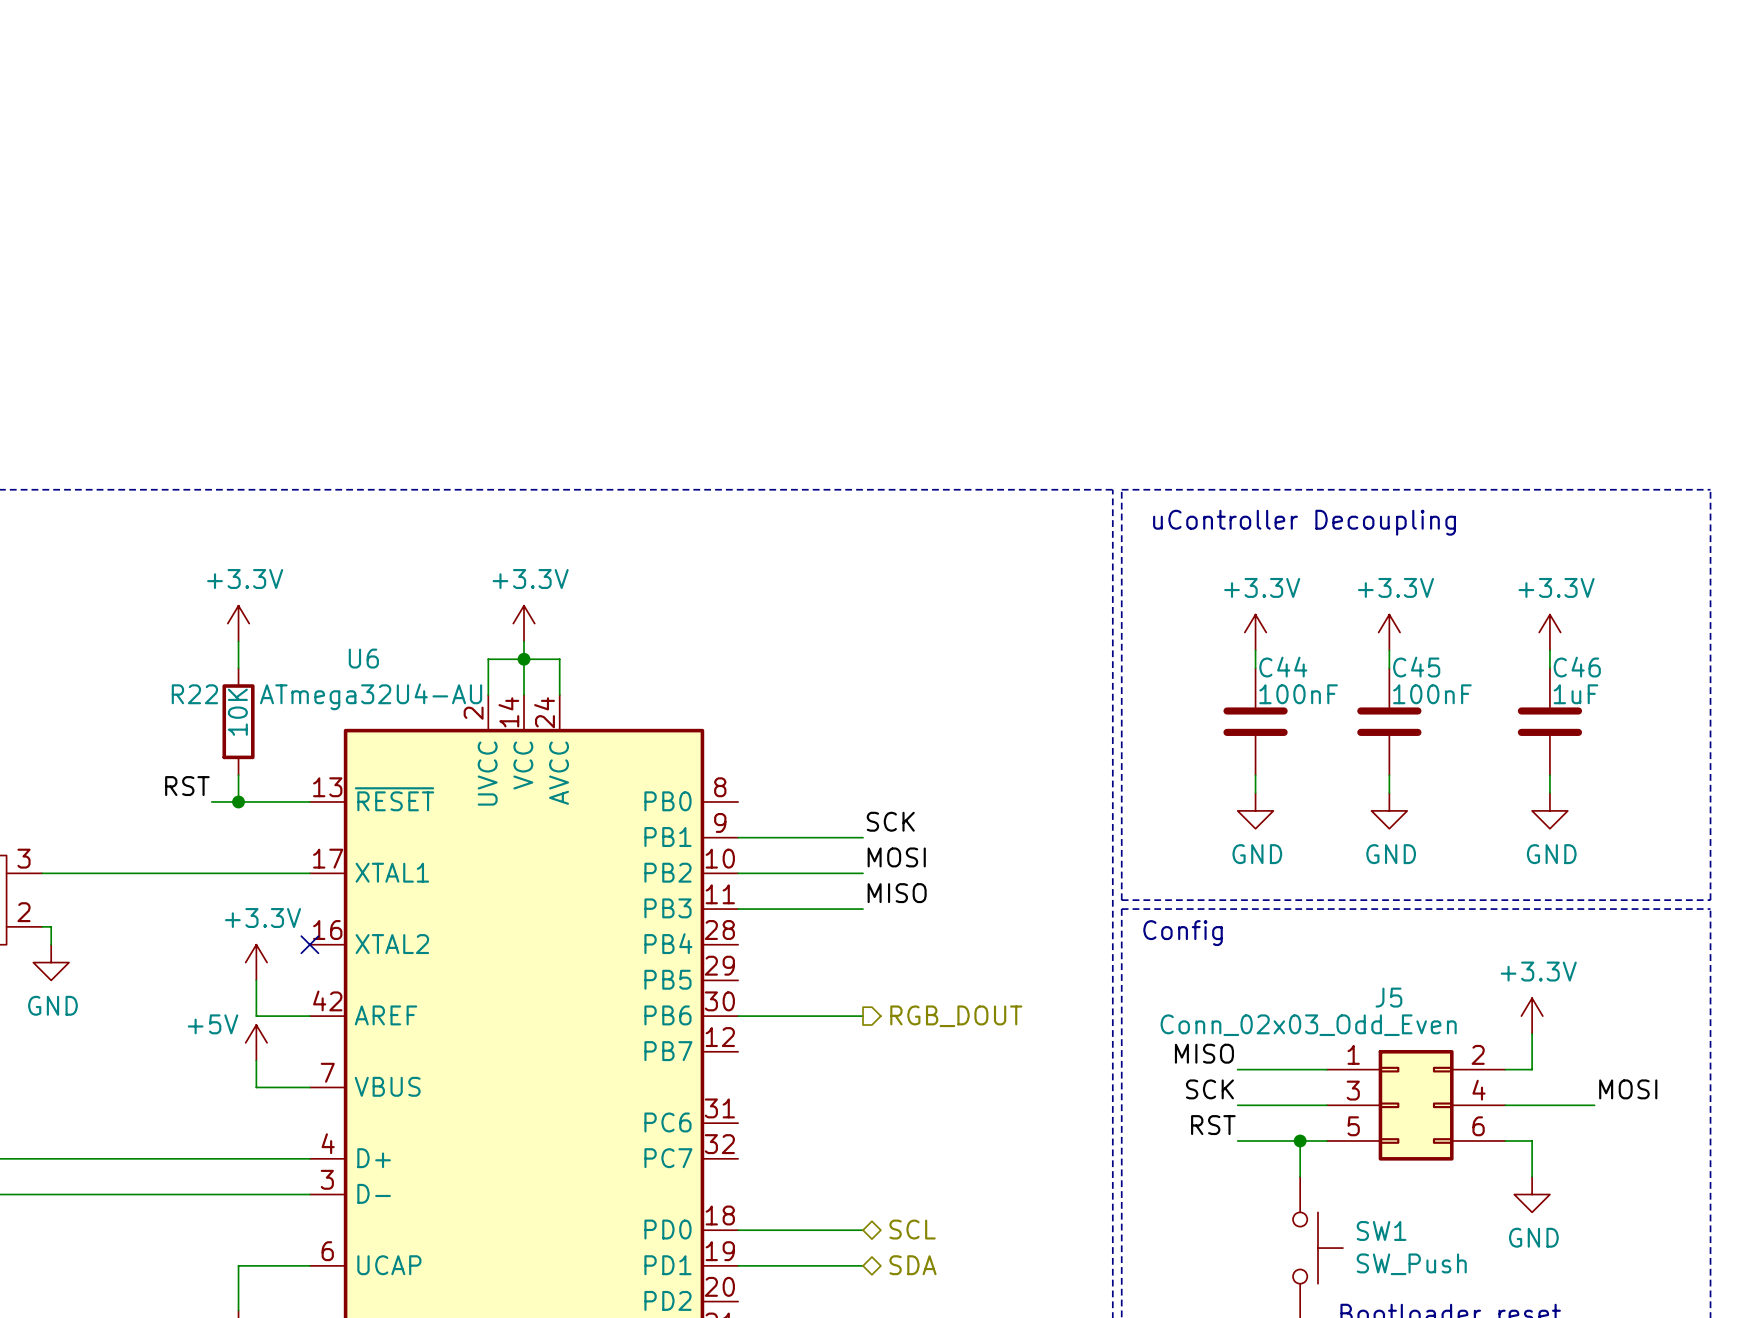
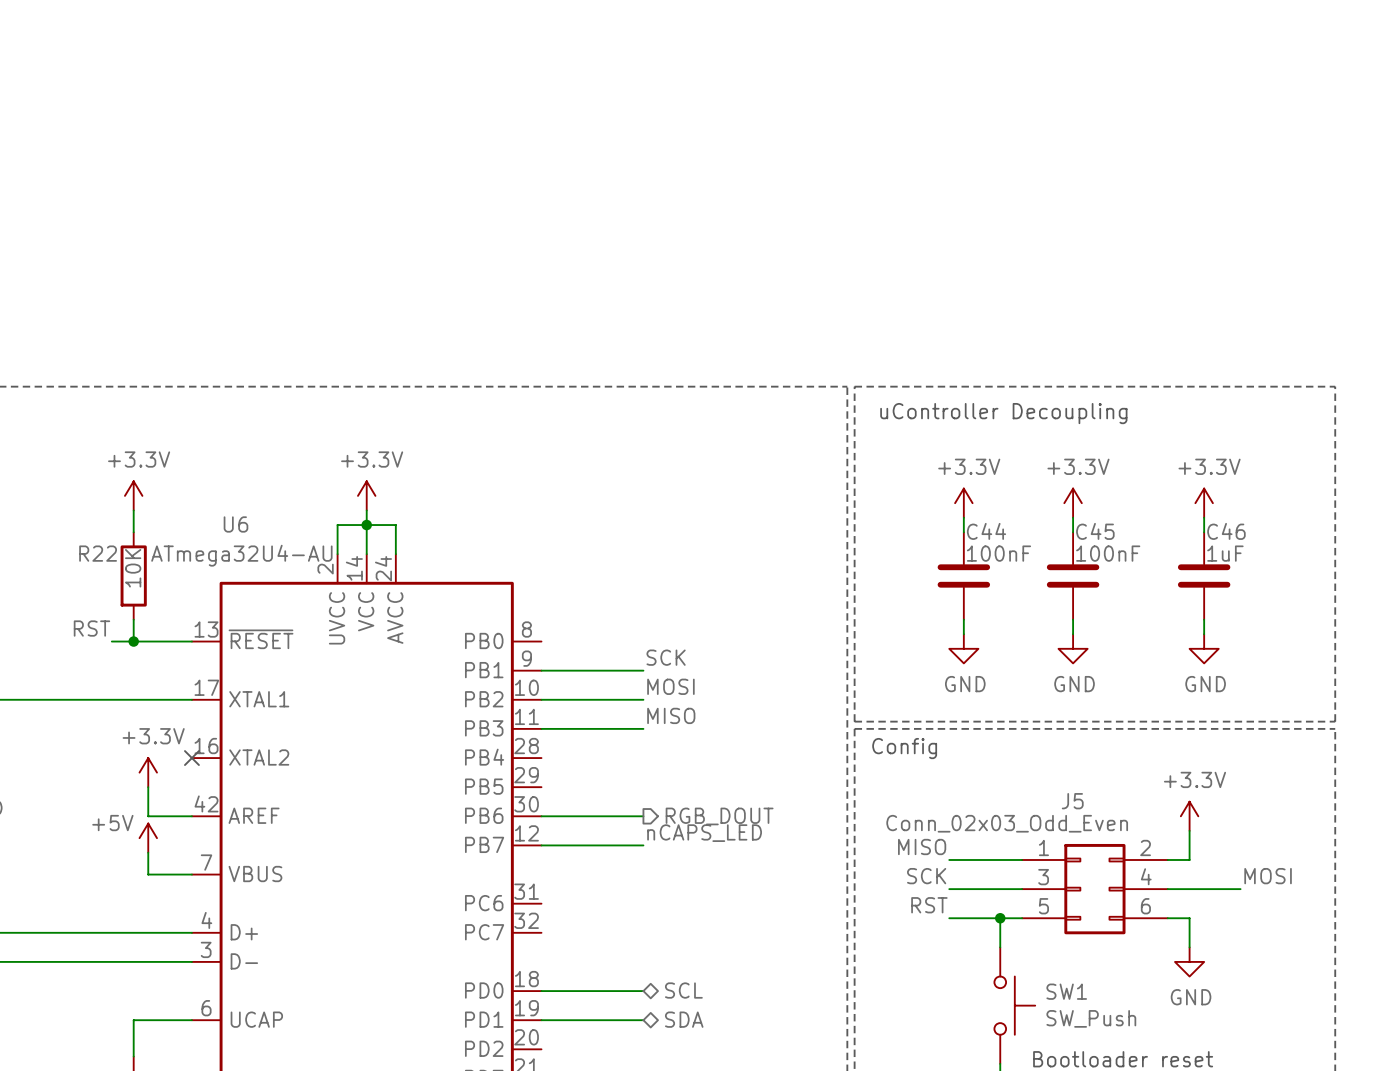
label: none -> nCAPS_LED (704, 833)
wire: none -> (541, 845) (643, 845)

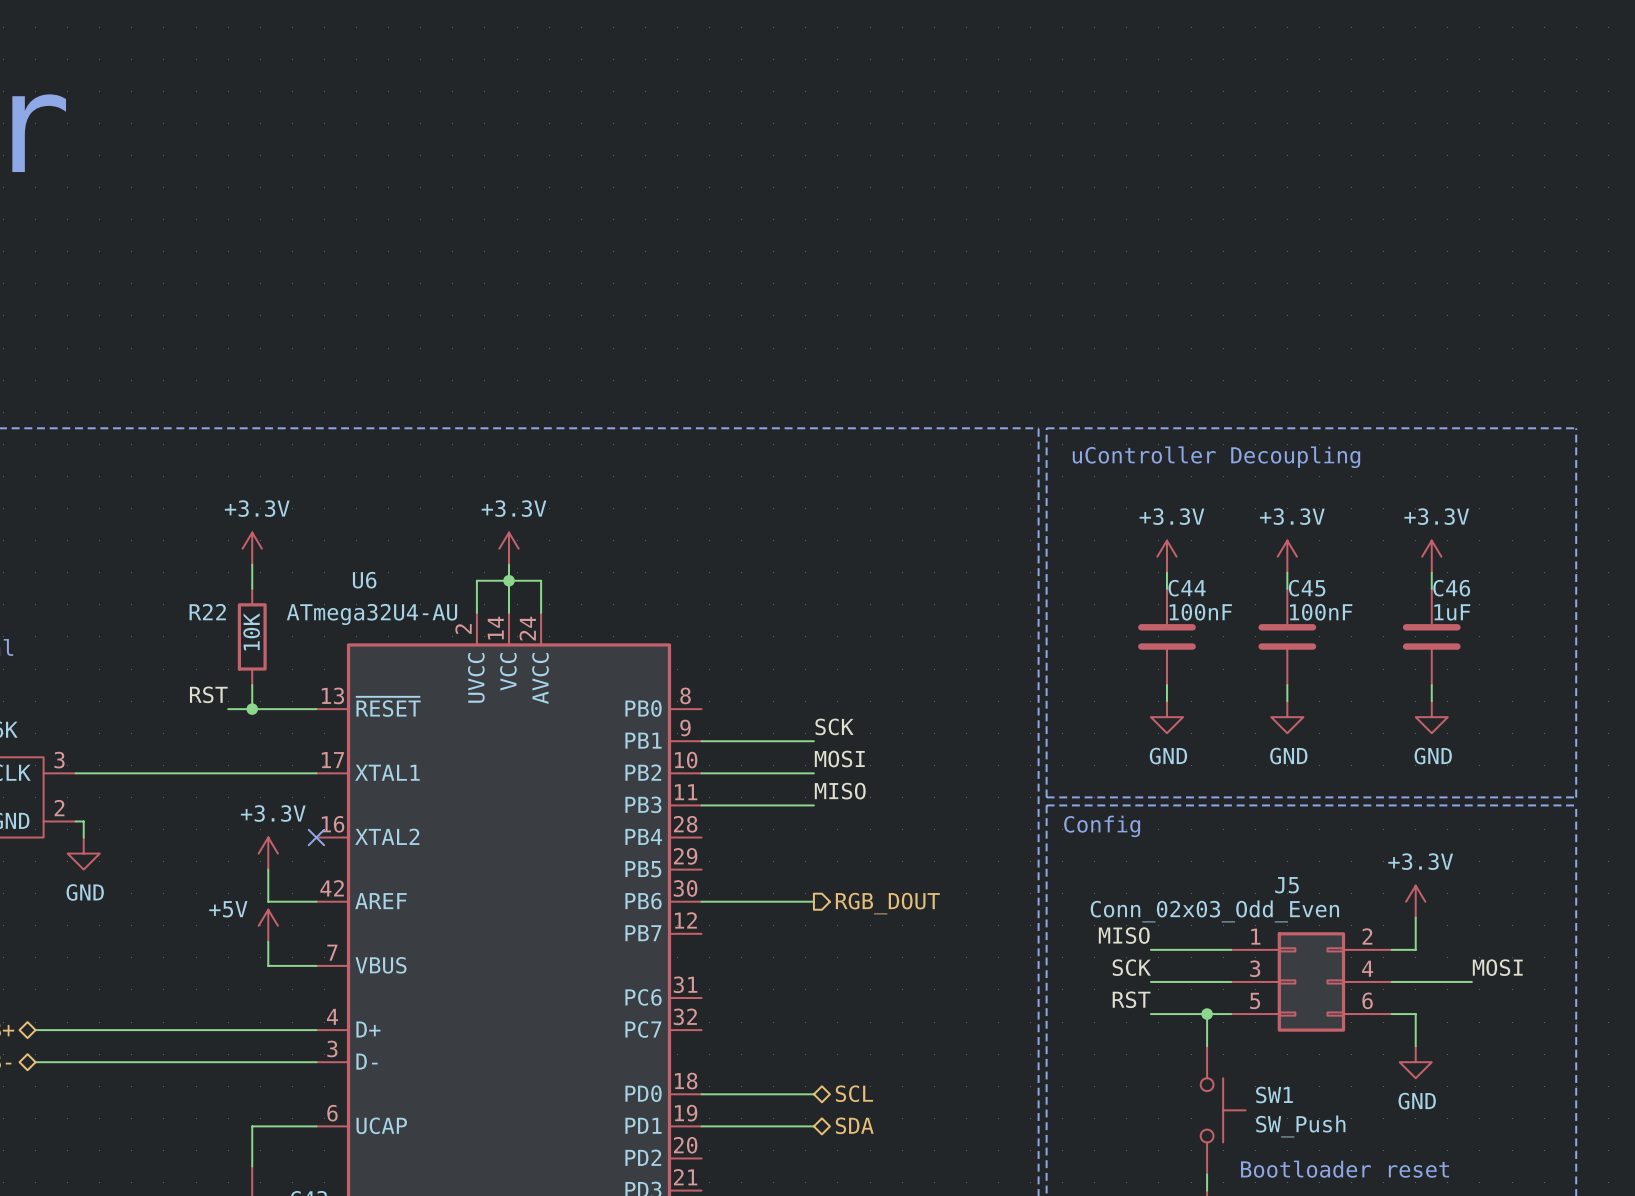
label: nCAPS_LED (704, 833) -> none
wire: (541, 845) (643, 845) -> none

